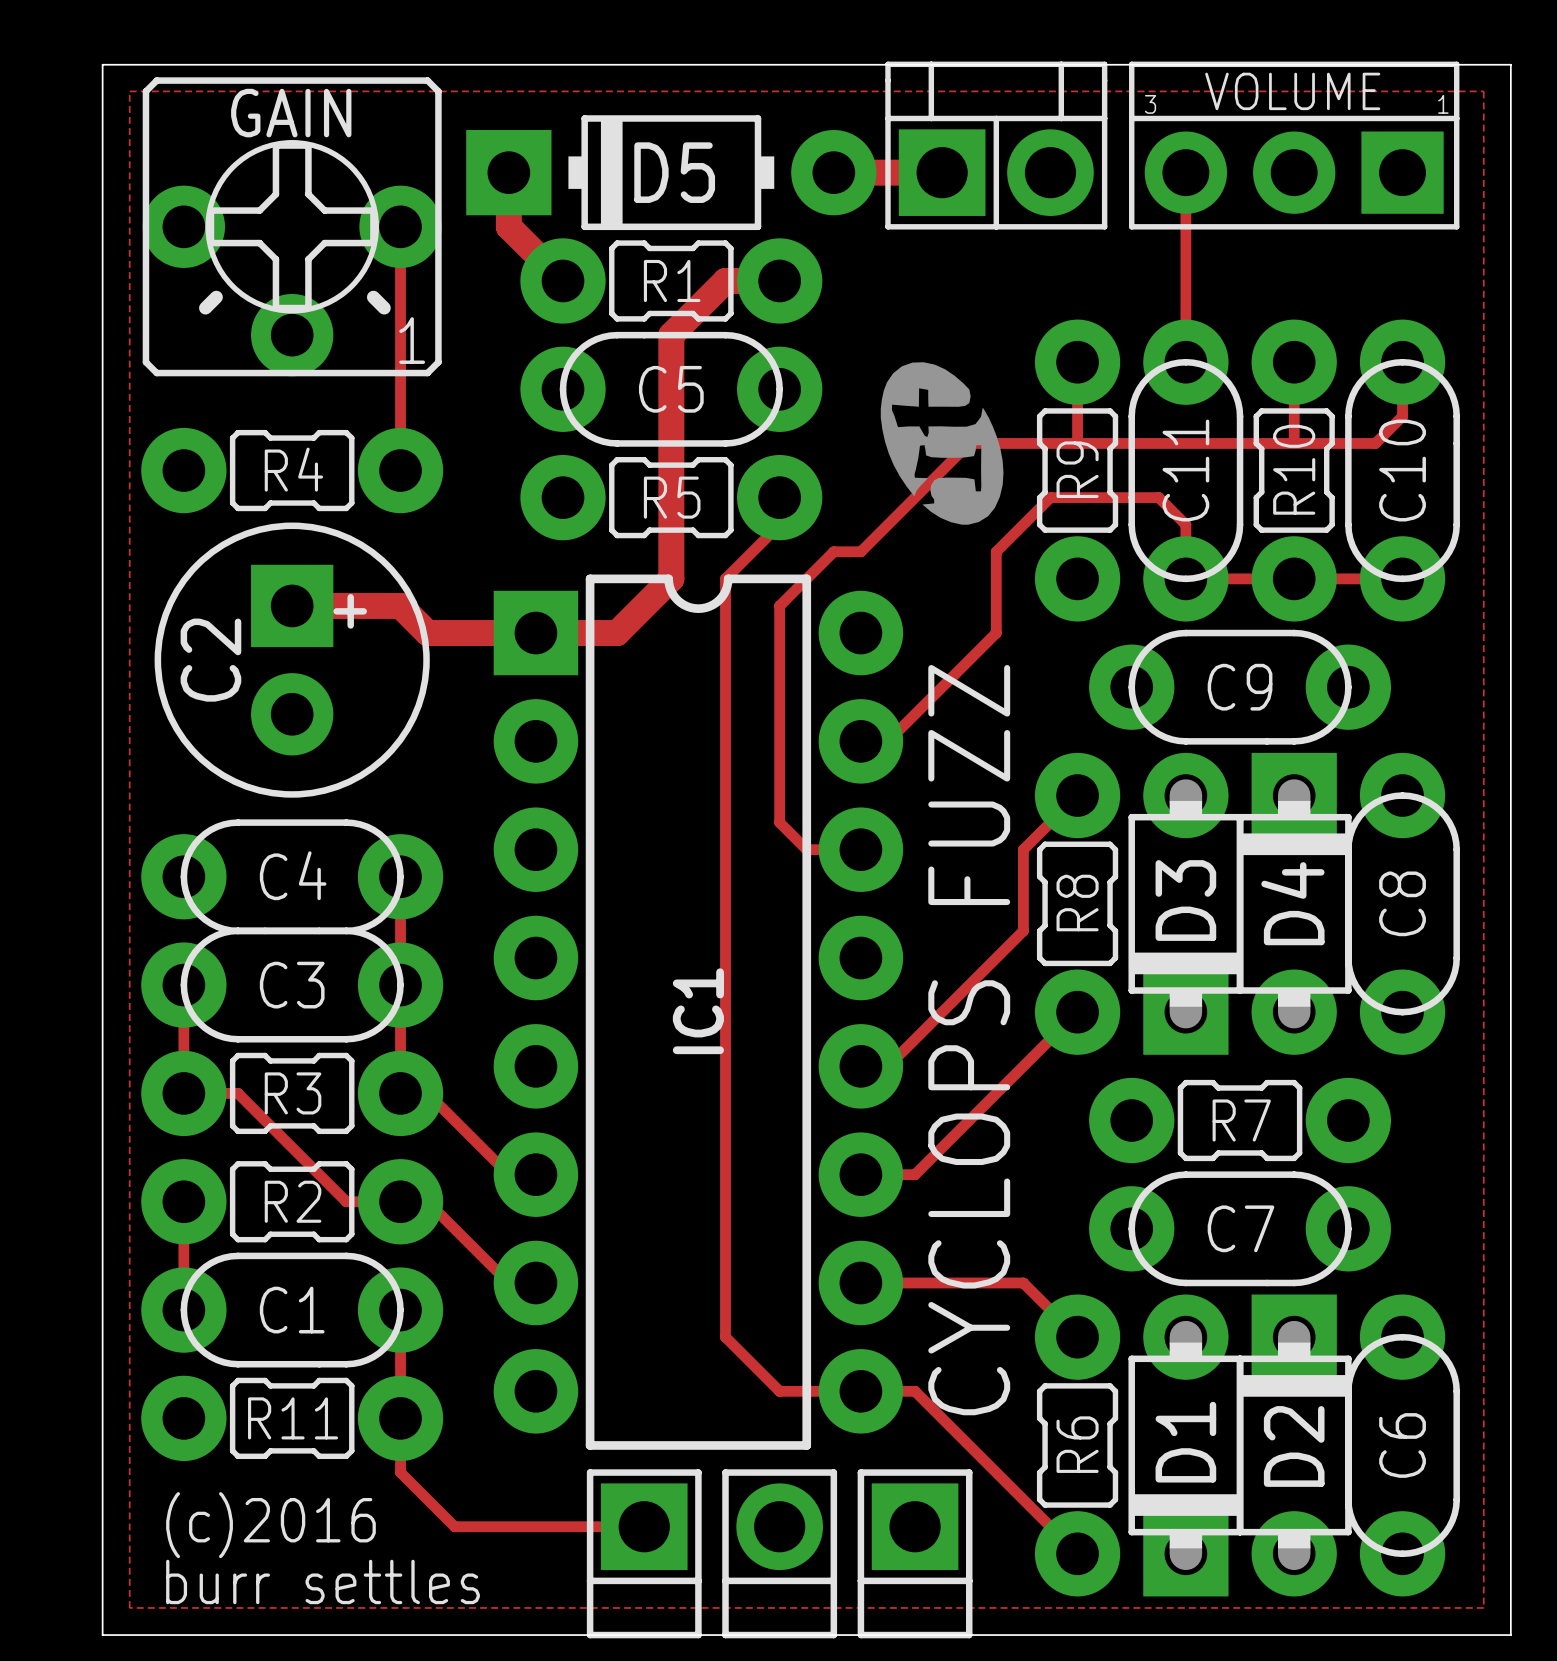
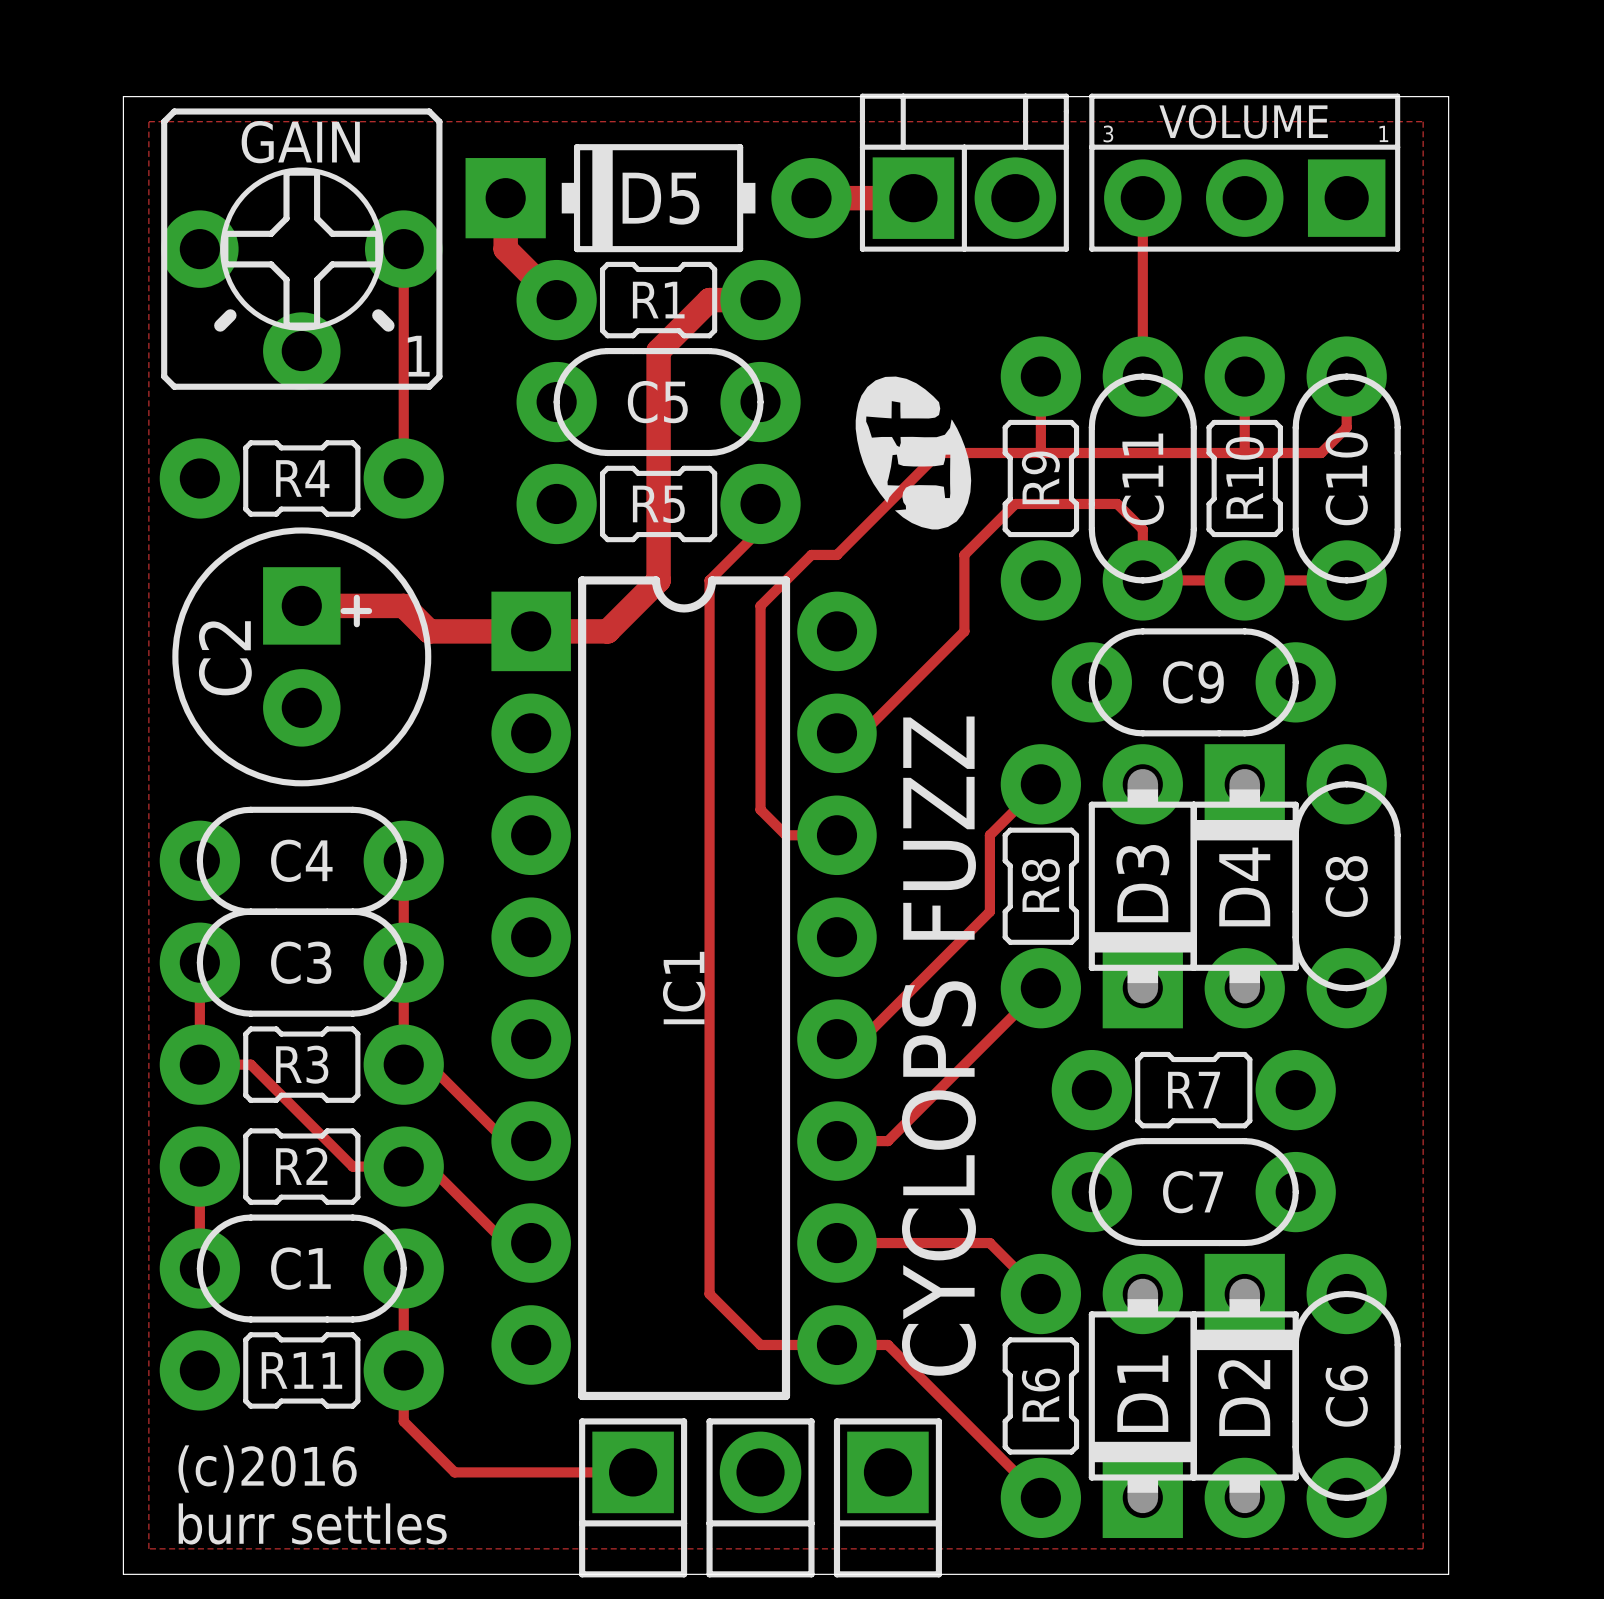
drawing shape: [880, 362, 1004, 525] -> [855, 376, 972, 530]

